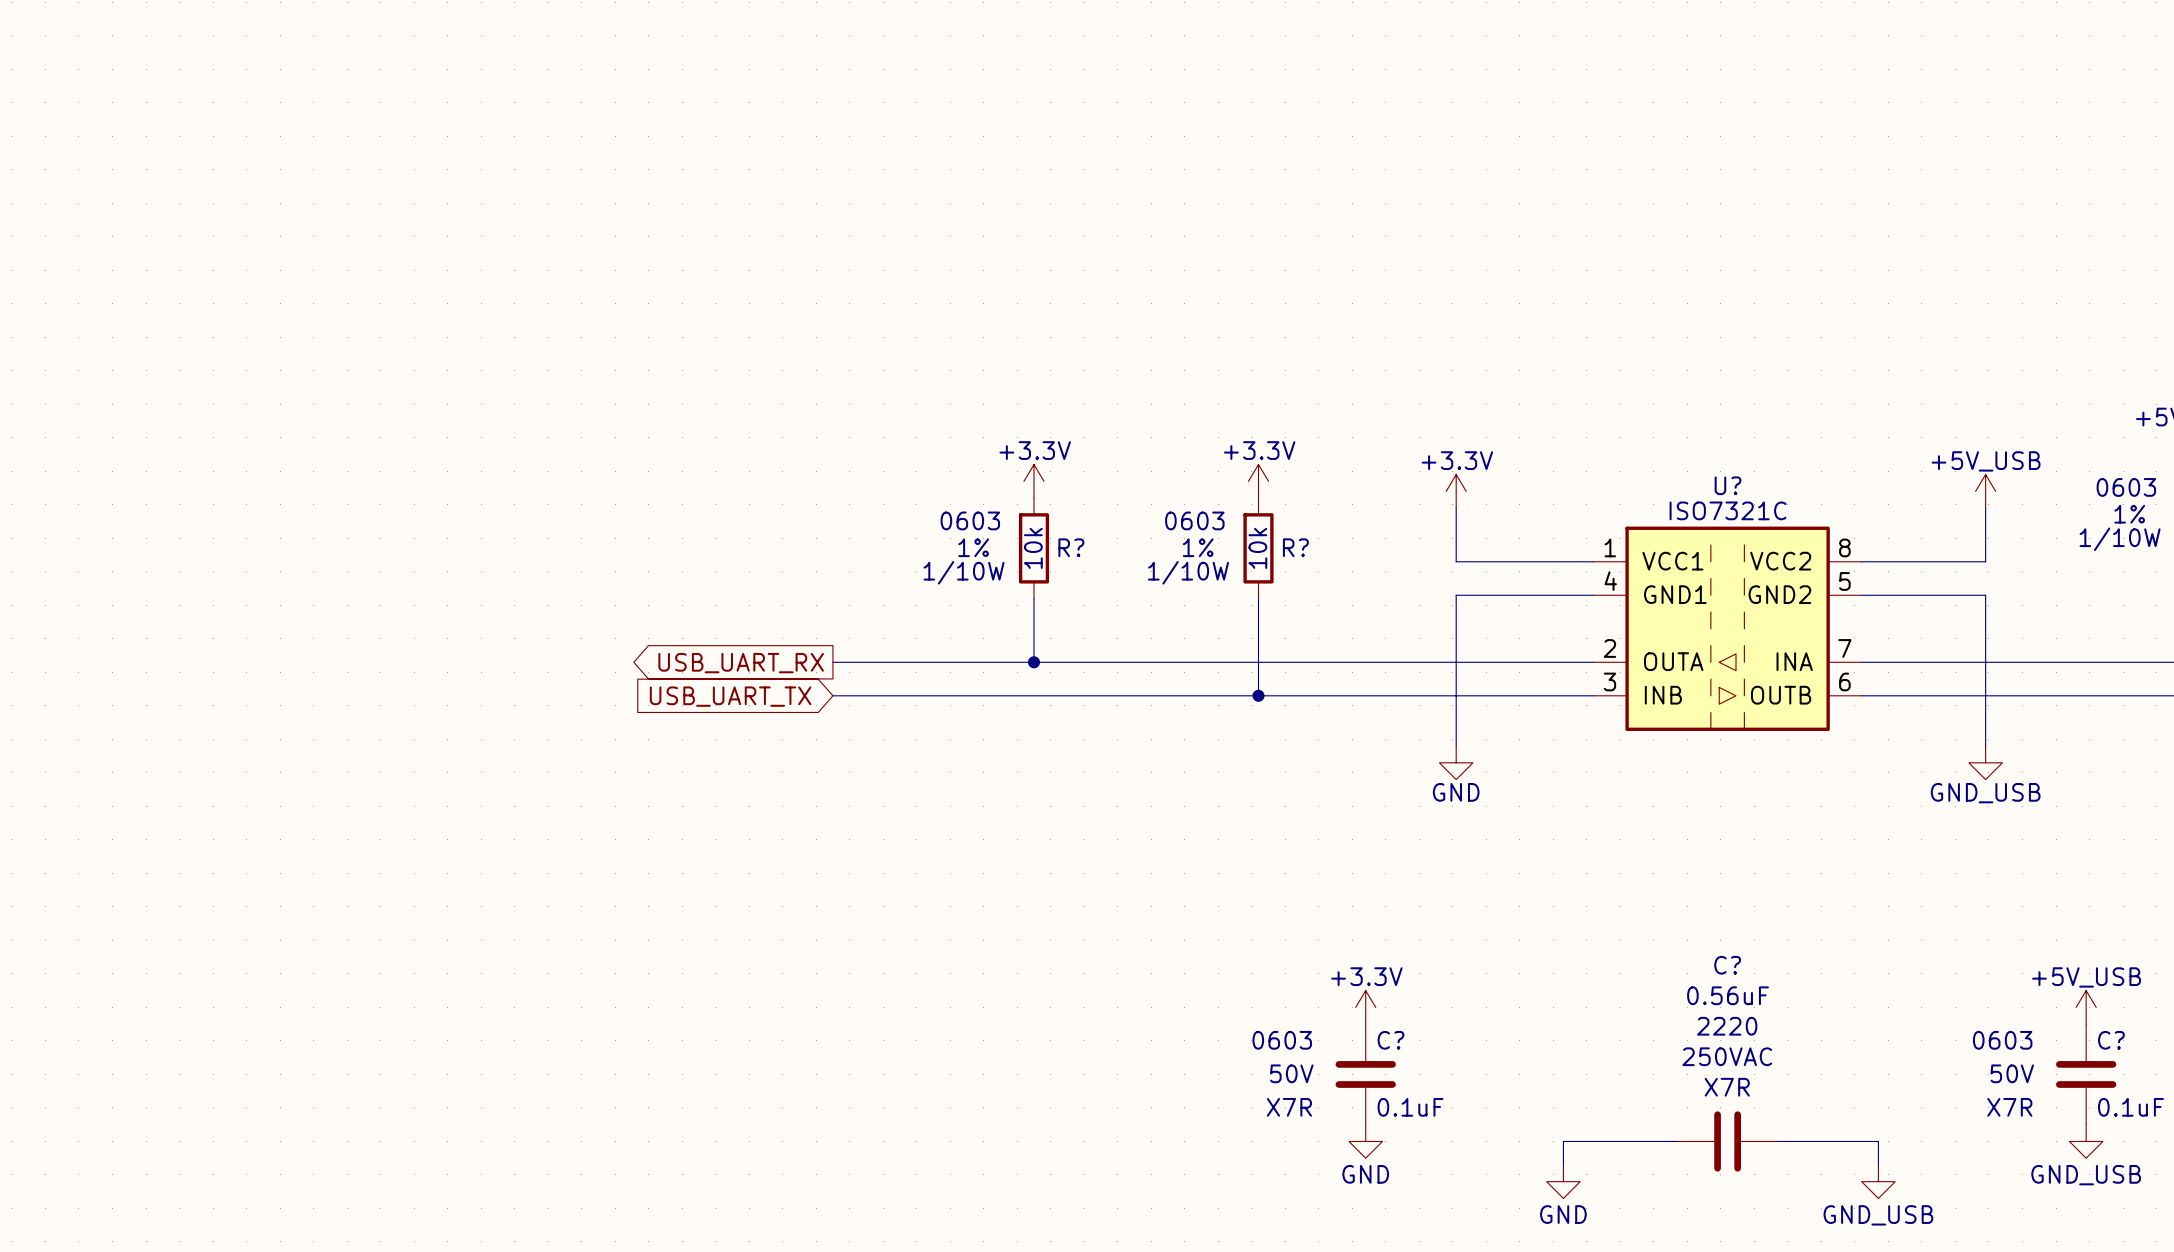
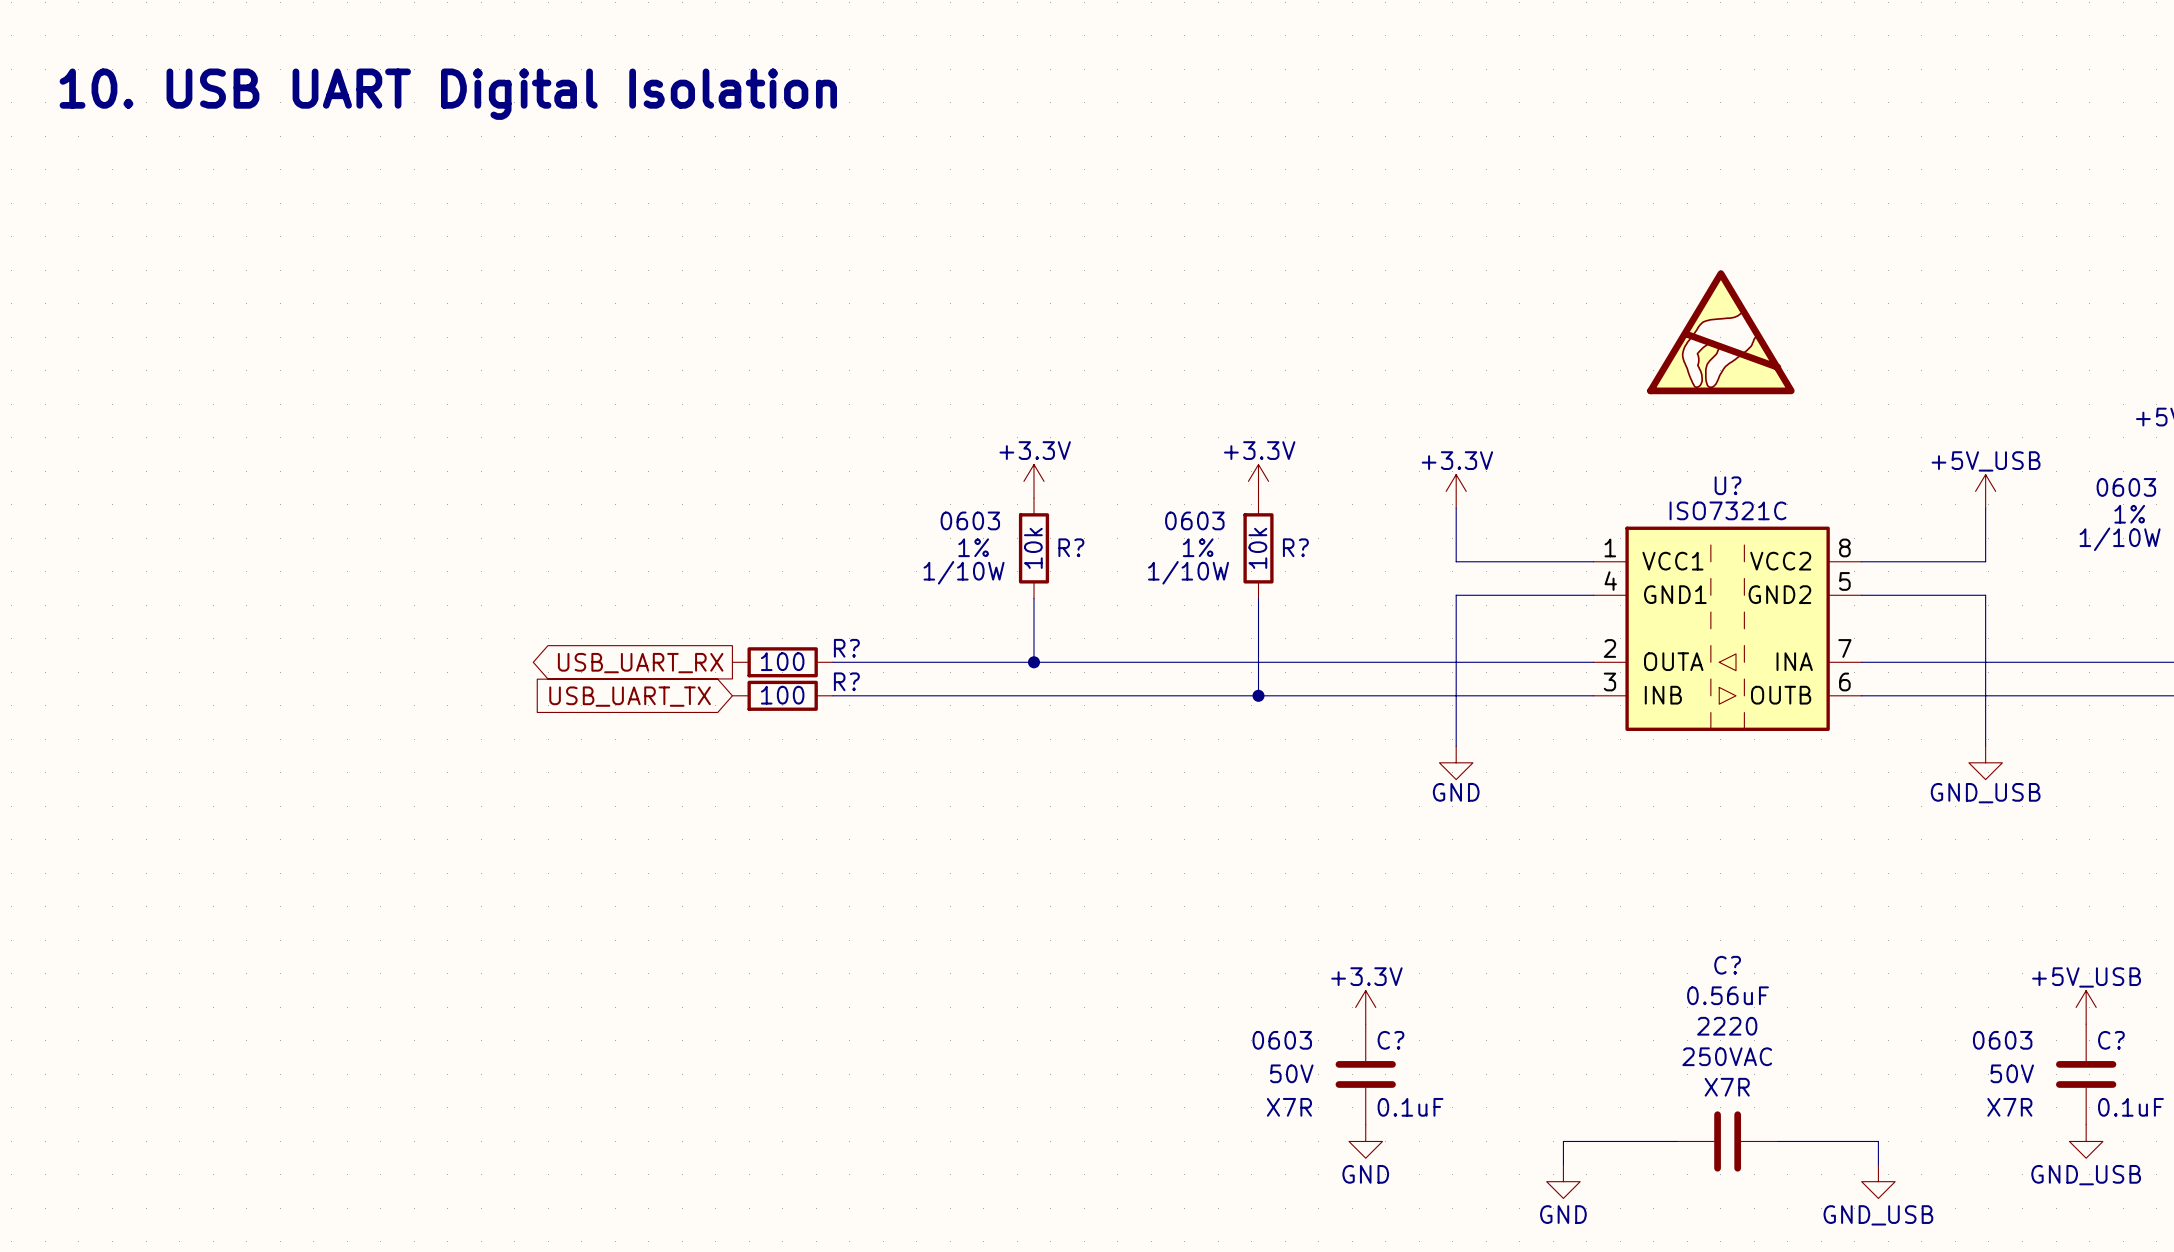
text: none -> 10. USB UART Digital Isolation (448, 94)
power symbol: none -> (1720, 332)
R?: none -> 100 (782, 662)
global label position: USB_UART_RX (741, 663) -> USB_UART_RX (640, 663)
R?: none -> 100 (782, 695)
global label position: USB_UART_TX (730, 696) -> USB_UART_TX (630, 696)

